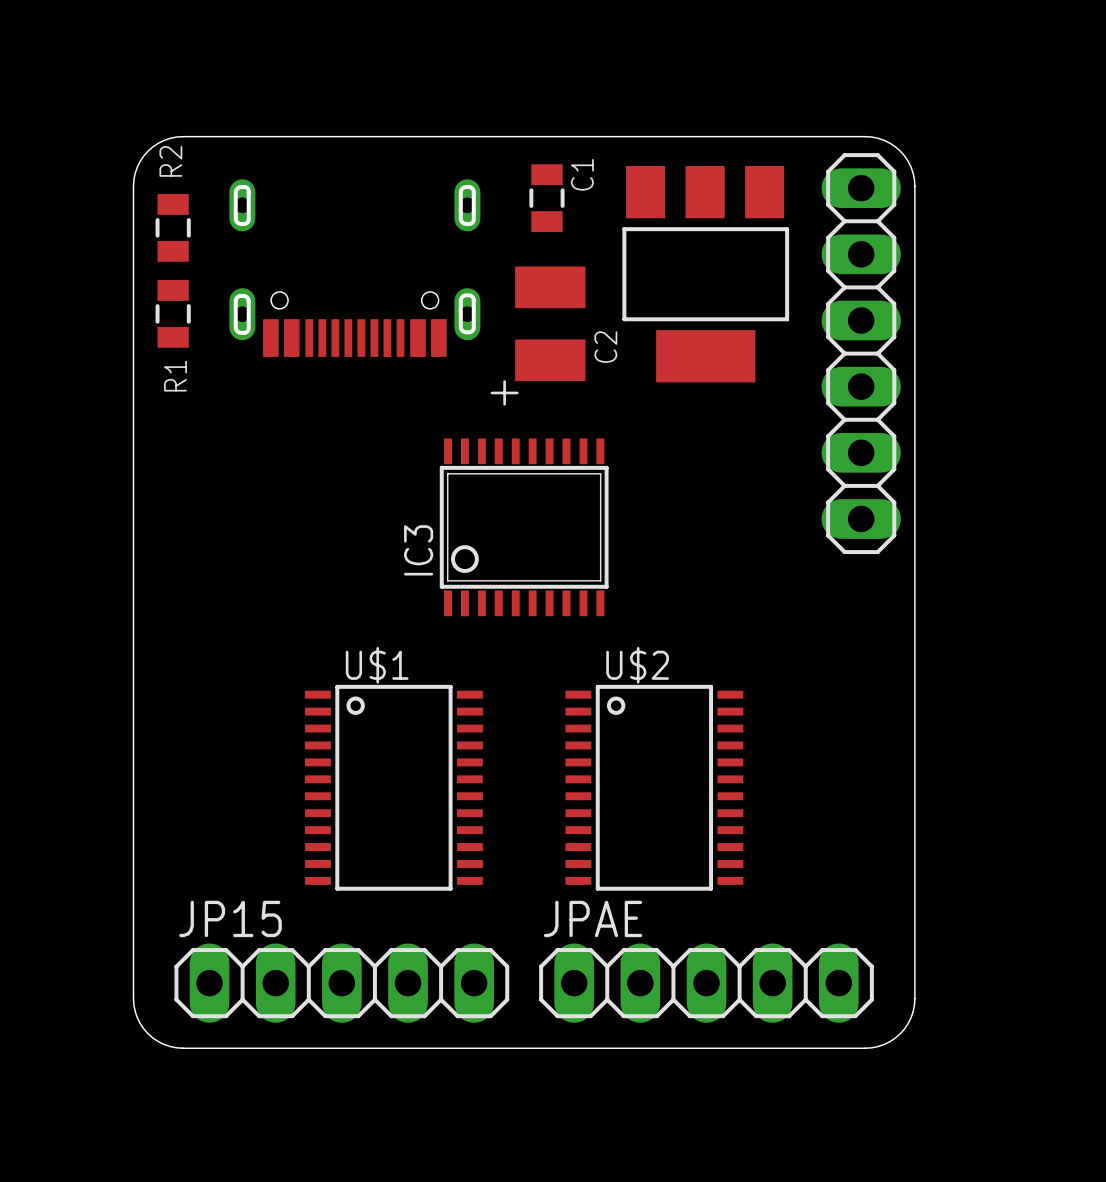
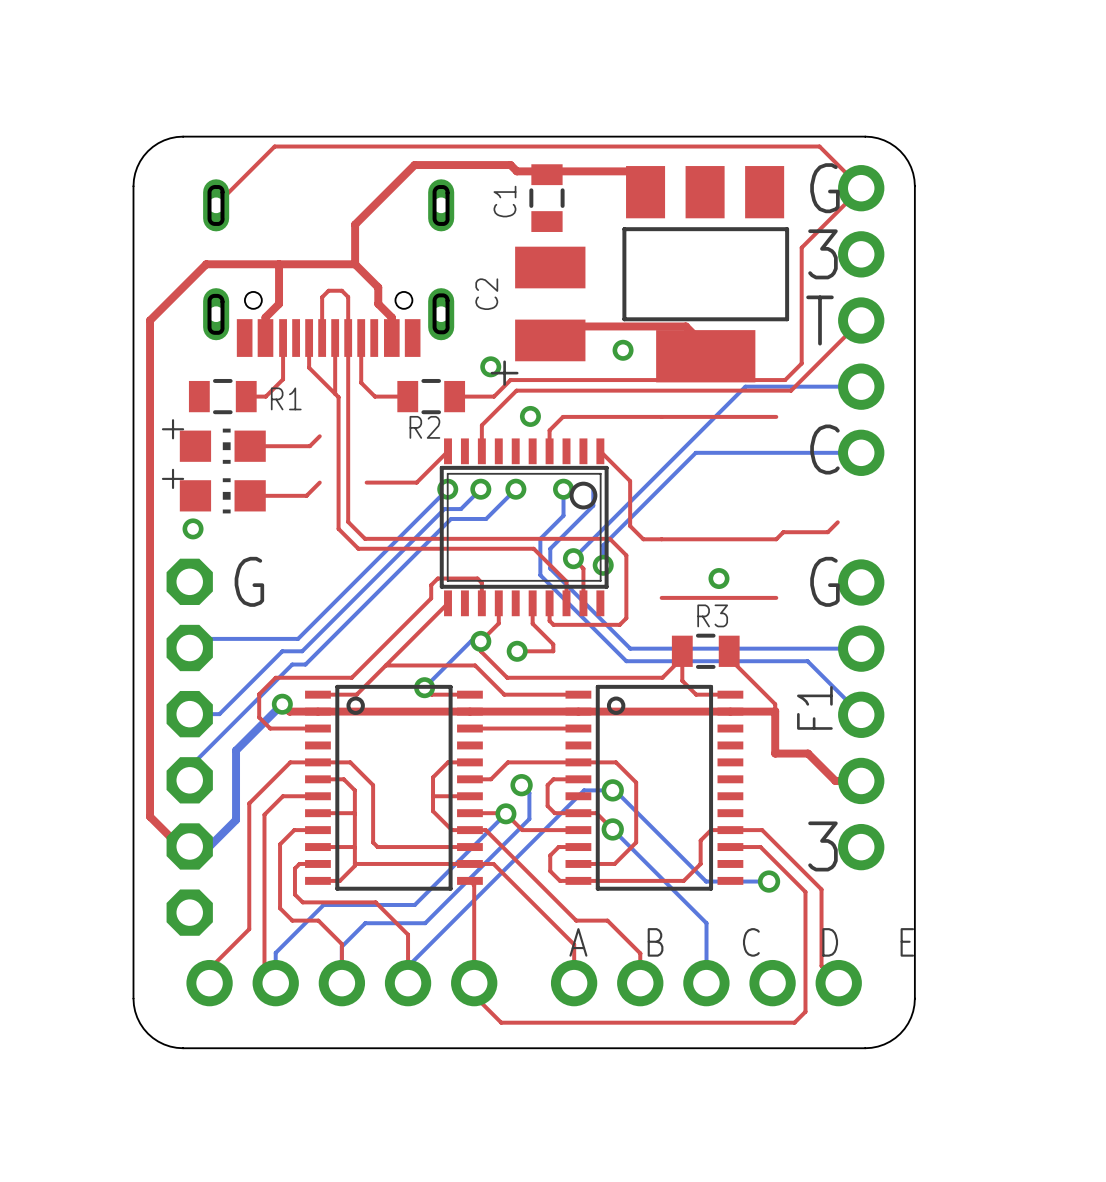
R2 name position: R2 (170, 161) -> R2 (424, 427)
C1 name position: C1 (582, 174) -> C1 (504, 201)
top track: none -> (645, 182) (634, 171) (516, 171) (510, 165) (414, 165) (355, 224) (355, 264)
text: none -> G (824, 188)
top track: none -> (216, 205) (274, 146) (819, 146) (861, 188) (801, 247) (801, 363) (785, 380) (510, 380) (494, 396) (454, 396)
R2 rotation: 0° (173, 227) -> 90° clockwise (431, 396)
R2 position: (173, 227) -> (431, 396)
text: none -> 3 (822, 254)
top track: none -> (279, 264) (279, 303) (265, 317) (265, 338)
top track: none -> (355, 264) (206, 264) (150, 320) (150, 816) (179, 846) (189, 846)
top track: none -> (355, 264) (378, 287) (378, 303) (391, 317) (391, 338)
part position: (354, 268) -> (328, 268)
R1 rotation: 0° (173, 313) -> 90° clockwise (222, 396)
R1 position: (173, 313) -> (222, 396)
text: none -> T (819, 320)
top track: none -> (861, 320) (791, 390) (516, 390) (481, 425) (481, 451)
part: none -> (861, 320)
C2 position: (550, 323) -> (550, 303)
top track: none -> (283, 338) (283, 379) (265, 396) (246, 396)
top track: none -> (309, 338) (309, 367) (338, 397) (338, 528) (358, 548) (533, 548) (566, 581) (566, 603)
top track: none -> (322, 338) (322, 297) (328, 290) (341, 290) (348, 297) (348, 521) (365, 538) (609, 538) (626, 555) (626, 618) (619, 624) (553, 624) (549, 620) (549, 603)
top track: none -> (335, 338) (335, 393)
top track: none -> (361, 338) (361, 382) (374, 396) (407, 396)
top track: none -> (550, 340) (564, 326) (685, 326) (705, 346)
C2 name position: C2 (605, 347) -> C2 (486, 294)
via: none -> (623, 350)
part: (861, 353) -> none
via: none -> (490, 366)
R1 name position: R1 (175, 376) -> R1 (286, 398)
bottom track: none -> (861, 386) (745, 386) (573, 558)
via: none -> (530, 416)
top track: none -> (776, 416) (563, 416) (549, 430) (549, 451)
top track: none -> (319, 436) (309, 446) (250, 446)
part: none -> (222, 446)
text: none -> C (824, 449)
top track: none -> (448, 451) (416, 482) (366, 482)
top track: none -> (600, 451) (630, 481) (630, 526) (643, 539) (776, 539) (783, 532) (827, 532) (837, 522)
bottom track: none -> (861, 452) (695, 452) (603, 545) (603, 565)
top track: none -> (319, 482) (306, 495) (250, 495)
bottom track: none -> (447, 489) (298, 638) (198, 638) (189, 647)
via: none -> (447, 489)
bottom track: none -> (480, 489) (460, 509) (444, 509) (302, 651) (282, 651) (219, 714) (189, 714)
via: none -> (480, 489)
bottom track: none -> (515, 489) (486, 518) (451, 518) (305, 664) (292, 664) (189, 767) (189, 780)
via: none -> (515, 489)
bottom track: none -> (563, 489) (563, 515) (540, 538) (540, 575) (626, 661) (807, 661) (861, 714)
via: none -> (563, 489)
bottom track: none -> (593, 489) (593, 505) (550, 548) (550, 568) (630, 648) (861, 648)
part: none -> (222, 495)
IC3: (524, 527) -> none
part: none -> (524, 527)
via: none -> (193, 528)
top track: none -> (573, 558) (583, 568) (583, 603)
via: none -> (573, 558)
via: none -> (603, 565)
via: none -> (718, 578)
text: none -> G (249, 581)
text: none -> G (824, 581)
top track: none -> (661, 597) (776, 597)
top track: none -> (448, 603) (356, 694) (317, 694)
top track: none -> (481, 603) (481, 582) (477, 578) (437, 578) (431, 585) (431, 598) (351, 677) (275, 677) (259, 694) (259, 717) (270, 728) (317, 728)
top track: none -> (498, 603) (498, 623) (480, 641) (480, 651) (507, 677) (662, 677) (680, 659) (682, 651) (682, 680) (696, 694) (730, 694)
top track: none -> (532, 603) (532, 623) (553, 644) (553, 651) (517, 651)
bottom track: none -> (480, 641) (470, 641) (424, 687)
via: none -> (480, 641)
via: none -> (517, 651)
R3: none -> (705, 651)
top track: none -> (729, 651) (729, 658) (775, 704) (775, 711)
U$1 name: U$1 (377, 665) -> none
top track: none -> (385, 665) (475, 665) (504, 694) (578, 694)
U$2 name: U$2 (637, 665) -> none
top track: none -> (424, 687) (431, 694) (469, 694)
via: none -> (424, 687)
top track: none -> (282, 704) (289, 711) (775, 711)
bottom track: none -> (282, 704) (236, 750) (236, 820) (209, 846) (189, 846)
via: none -> (282, 704)
text: none -> F1 (814, 707)
top track: none -> (775, 711) (775, 753) (808, 753) (835, 780) (861, 780)
part: none -> (861, 714)
top track: none -> (469, 728) (578, 728)
part: none -> (189, 747)
top track: none -> (469, 762) (448, 762) (433, 777) (433, 811) (451, 830) (485, 830) (576, 920) (607, 920) (640, 953) (640, 983)
top track: none -> (317, 779) (343, 779) (354, 790) (354, 865) (339, 880) (317, 880)
top track: none -> (469, 779) (490, 779) (507, 762) (616, 762) (636, 782) (636, 842) (614, 863) (578, 863)
top track: none -> (578, 779) (553, 779) (547, 785) (547, 806) (554, 813) (596, 813) (612, 829)
bottom track: none -> (521, 785) (529, 792) (529, 819) (425, 923) (365, 923) (341, 946) (341, 983)
via: none -> (521, 785)
via: none -> (612, 790)
top track: none -> (433, 795) (469, 796)
top track: none -> (317, 796) (282, 796) (264, 814) (264, 971) (275, 983)
top track: none -> (317, 813) (354, 813)
top track: none -> (469, 813) (505, 813) (522, 830) (578, 830)
bottom track: none -> (505, 813) (414, 904) (323, 904) (275, 952) (275, 983)
via: none -> (505, 813)
bottom track: none -> (612, 829) (706, 923) (706, 983)
via: none -> (612, 829)
top track: none -> (317, 830) (294, 830) (280, 844) (280, 908) (292, 920) (318, 920) (341, 944) (341, 983)
text: none -> 3 (822, 846)
top track: none -> (317, 847) (354, 847)
top track: none -> (469, 847) (377, 847) (373, 842) (373, 785) (350, 762) (290, 762) (249, 803) (249, 929) (209, 968) (209, 983)
top track: none -> (578, 847) (558, 847) (550, 855) (550, 871) (560, 880) (683, 880) (700, 863) (700, 840) (711, 830) (762, 830) (821, 889) (821, 965) (838, 983)
top track: none -> (730, 847) (760, 847) (805, 891) (805, 1011) (794, 1022) (501, 1022) (474, 995) (474, 885) (469, 880)
top track: none -> (317, 863) (299, 863) (294, 868) (294, 894) (302, 902) (375, 902) (408, 934) (408, 983)
top track: none -> (354, 863) (493, 863) (574, 944) (574, 983)
bottom track: none -> (769, 881) (706, 881) (615, 790) (584, 790) (408, 966) (408, 983)
via: none -> (769, 881)
text: none -> A B C D E (741, 942)
JP15: (341, 983) -> none
part: none -> (341, 983)
JPAE: (706, 983) -> none
part: none -> (706, 983)

